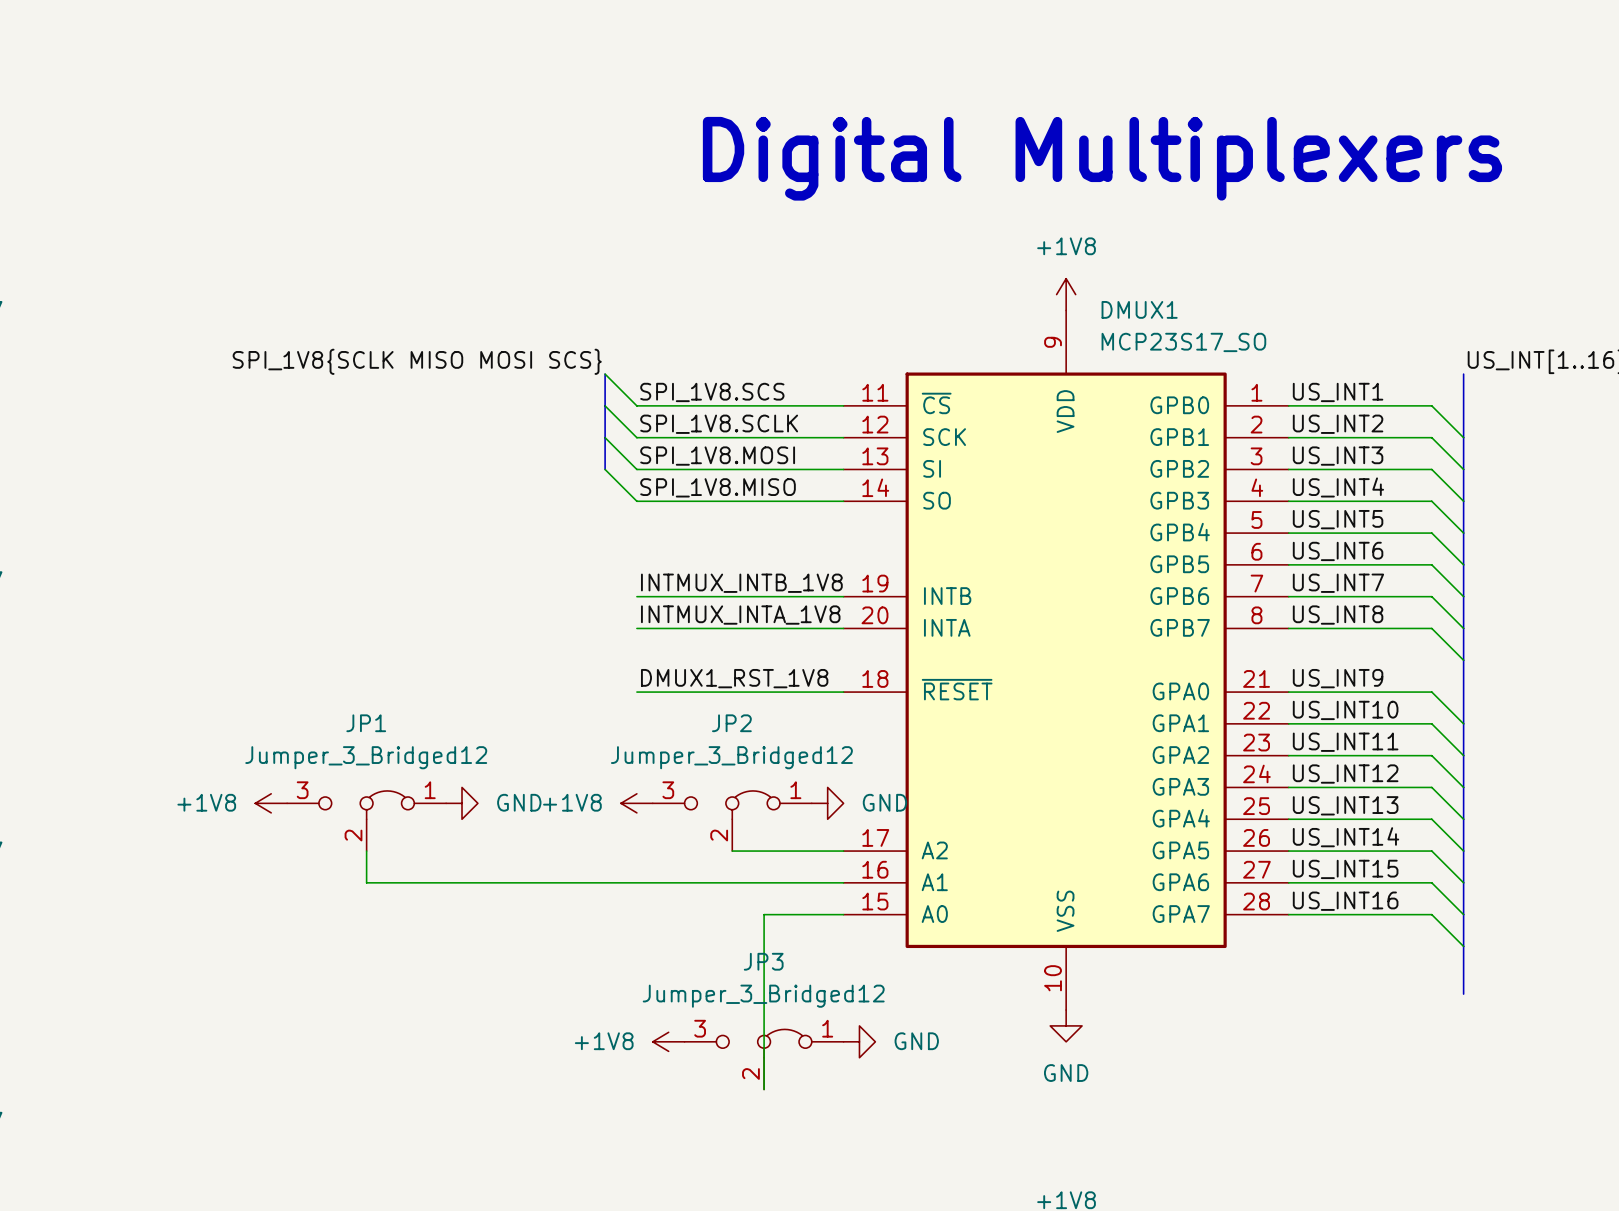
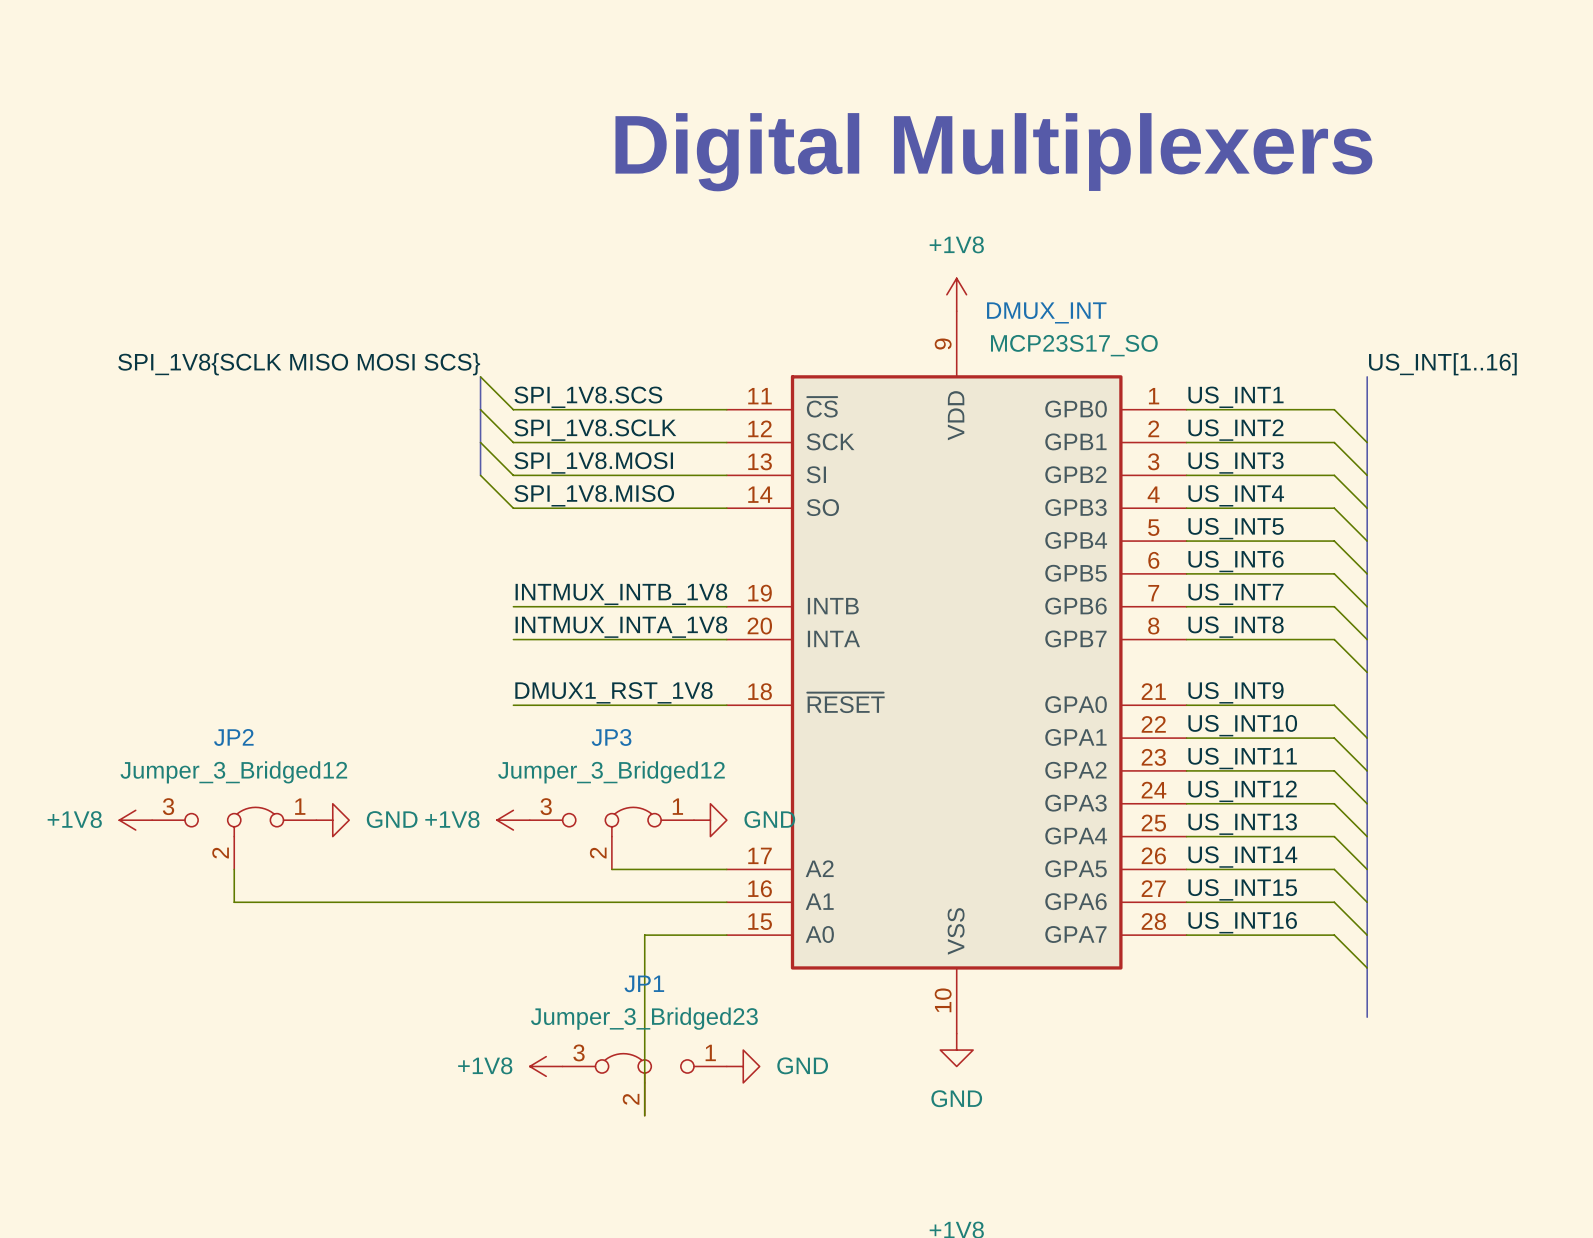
DMUX1 name: DMUX1 (1139, 309) -> DMUX_INT (1046, 312)
JP1 name: JP1 (366, 723) -> JP2 (233, 737)
JP2 name: JP2 (731, 723) -> JP3 (611, 737)
JP3: Jumper_3_Bridged12 (764, 1059) -> none
JP1: none -> Jumper_3_Bridged23 (644, 1084)

